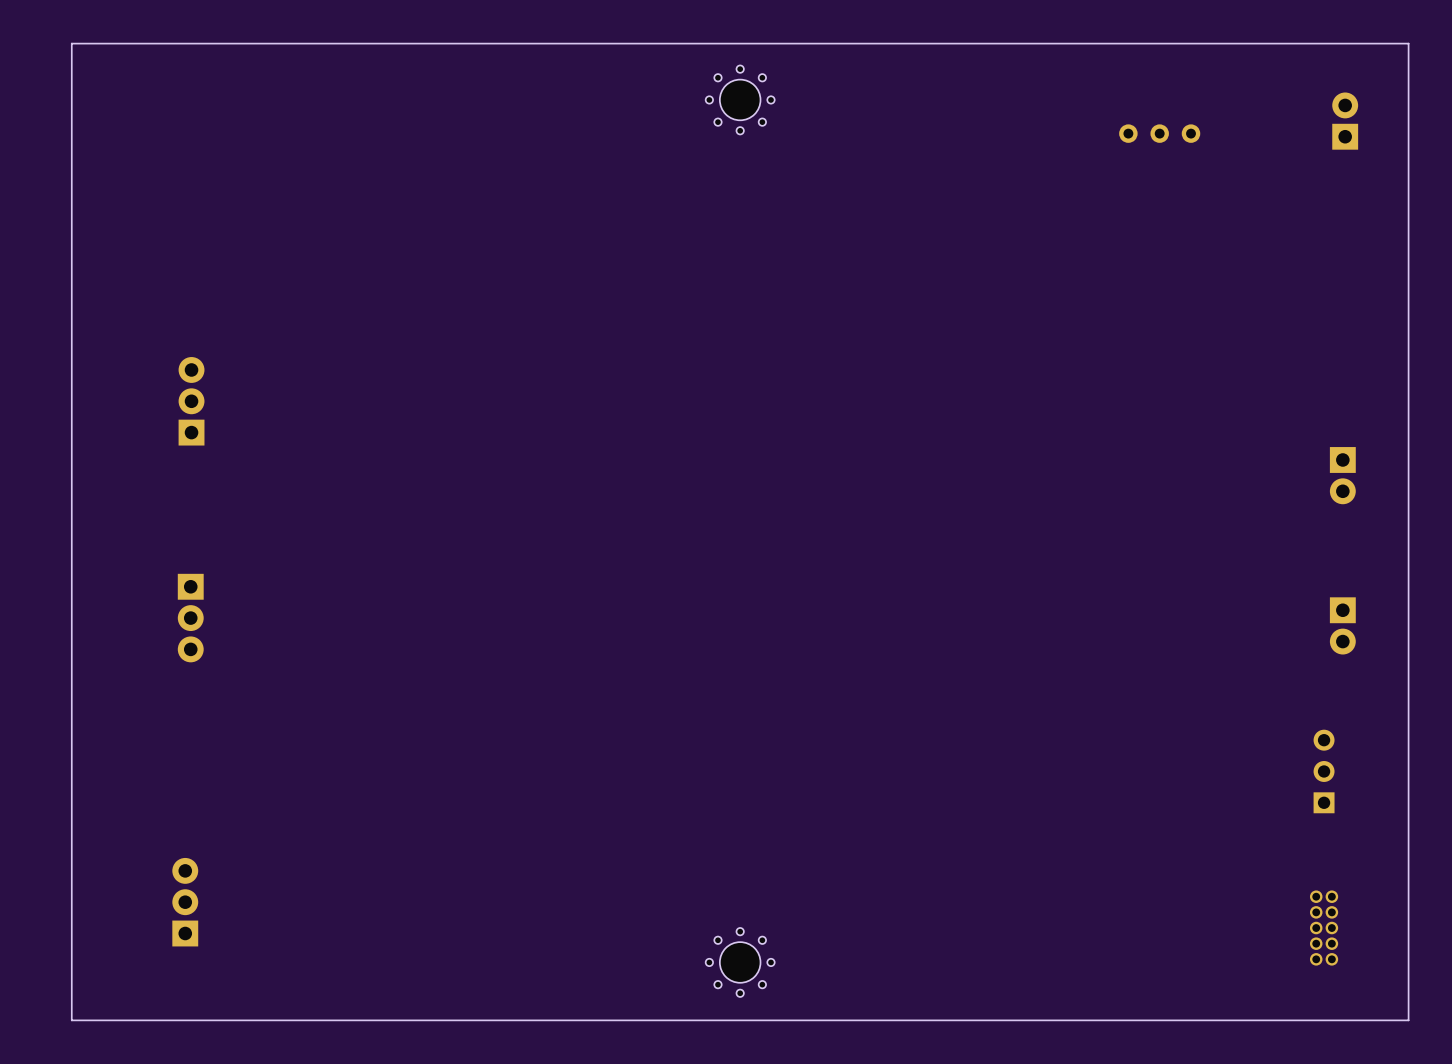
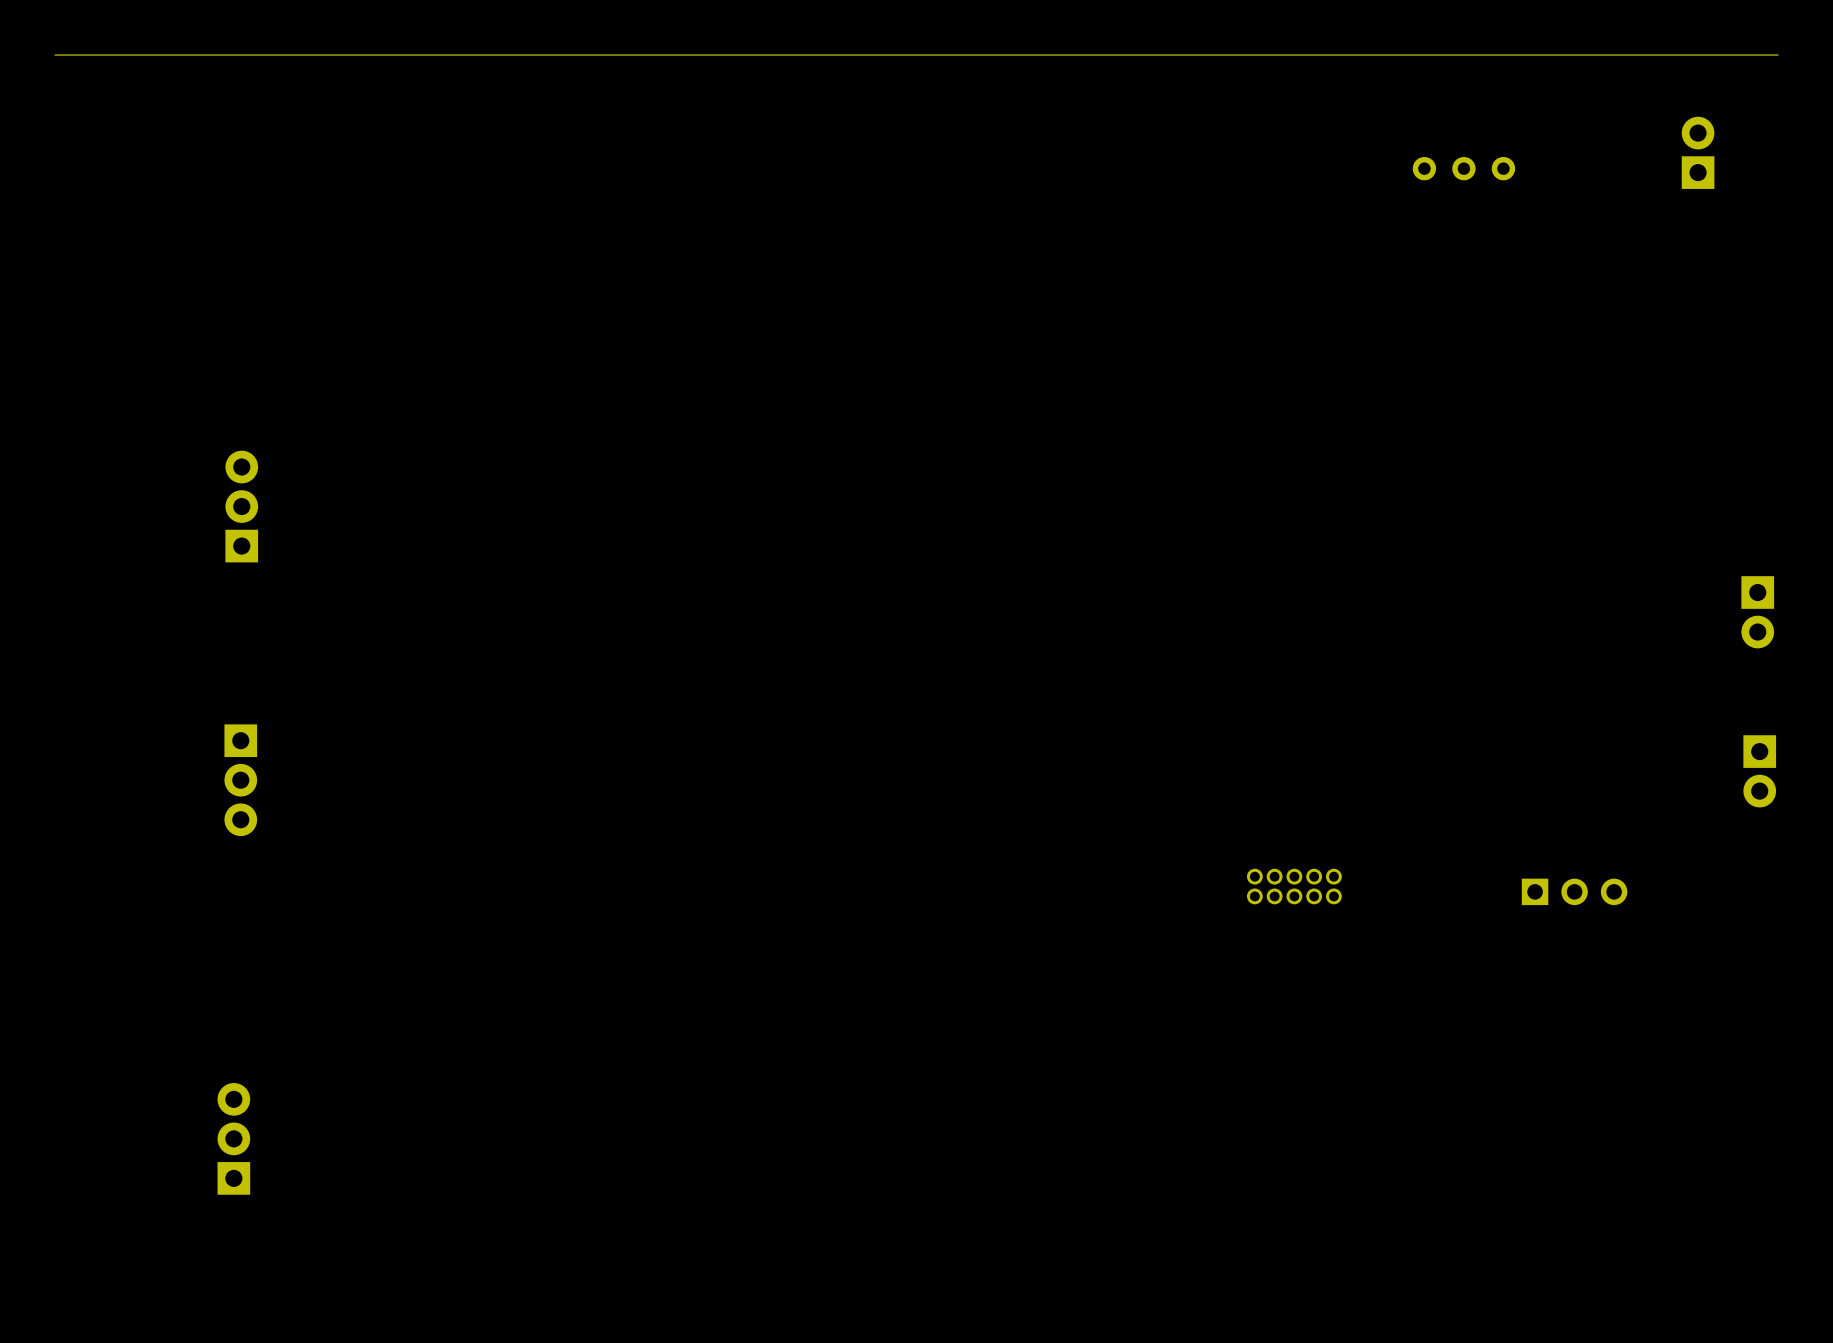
board edge: (1408, 43) (1408, 1020) (71, 1020) (71, 43) -> (55, 55) (90, 55)
part: (740, 99) -> none
part position: (1342, 475) -> (1757, 612)
part position: (1342, 625) -> (1759, 771)
part: none -> (1294, 886)
part rotation: 0° (1324, 771) -> 90° clockwise (1574, 891)
part position: (1324, 771) -> (1574, 891)
part: (1324, 928) -> none
part: (740, 962) -> none

